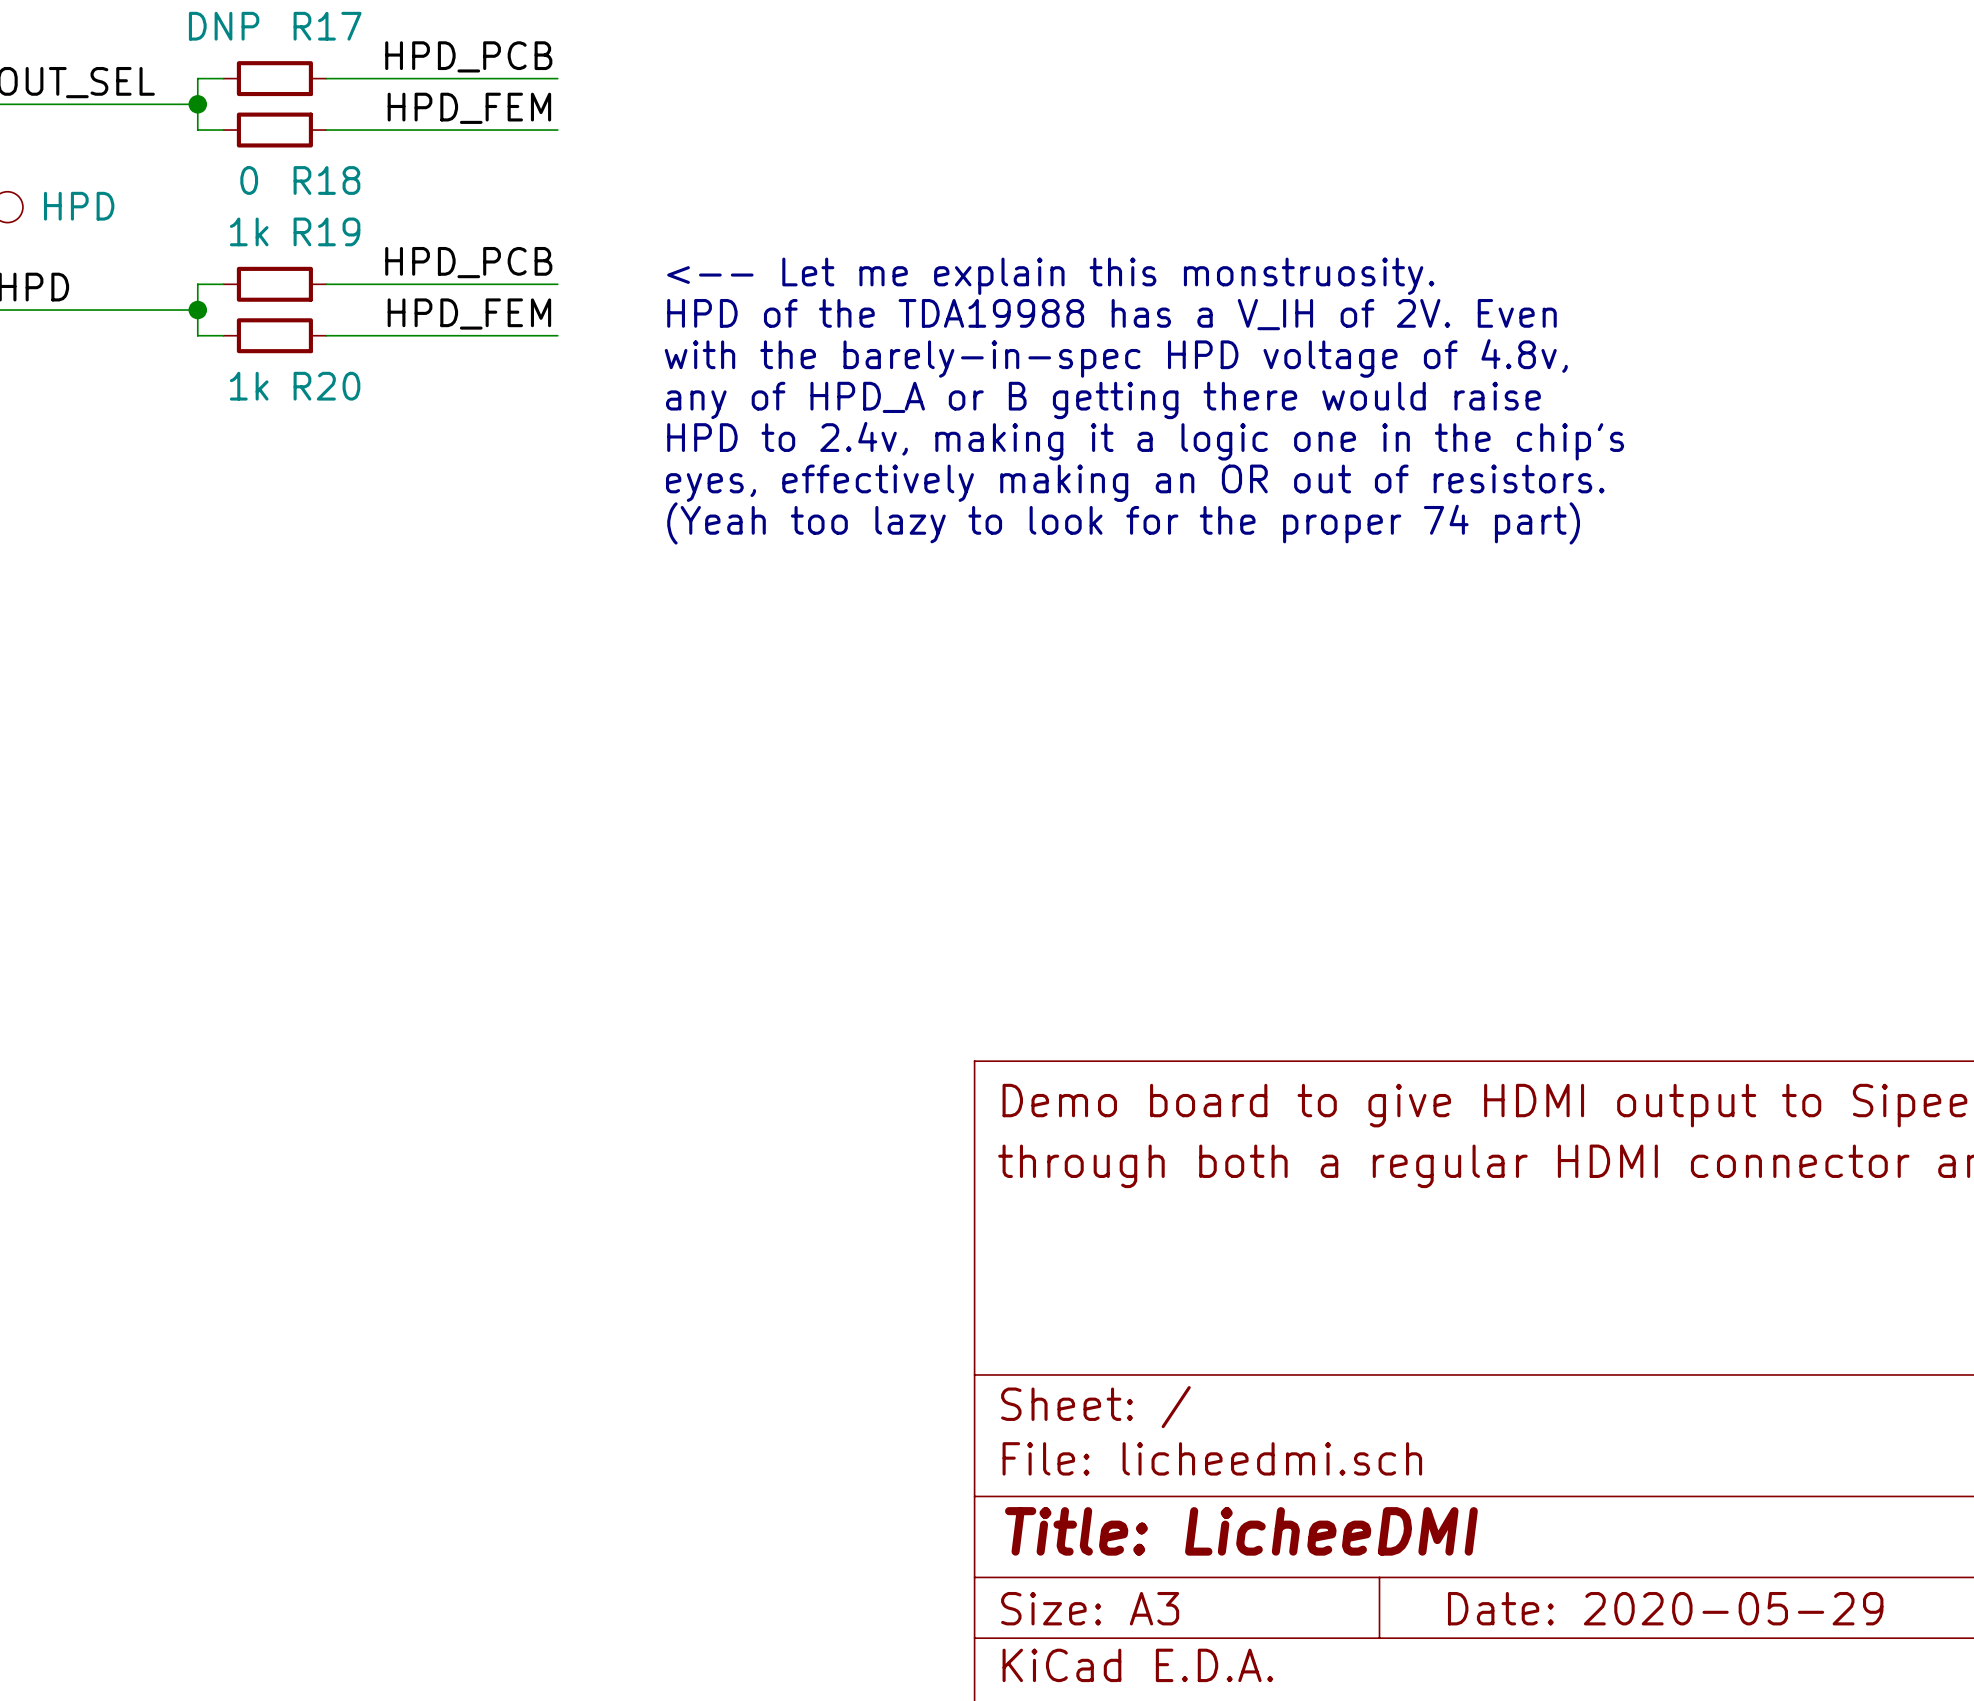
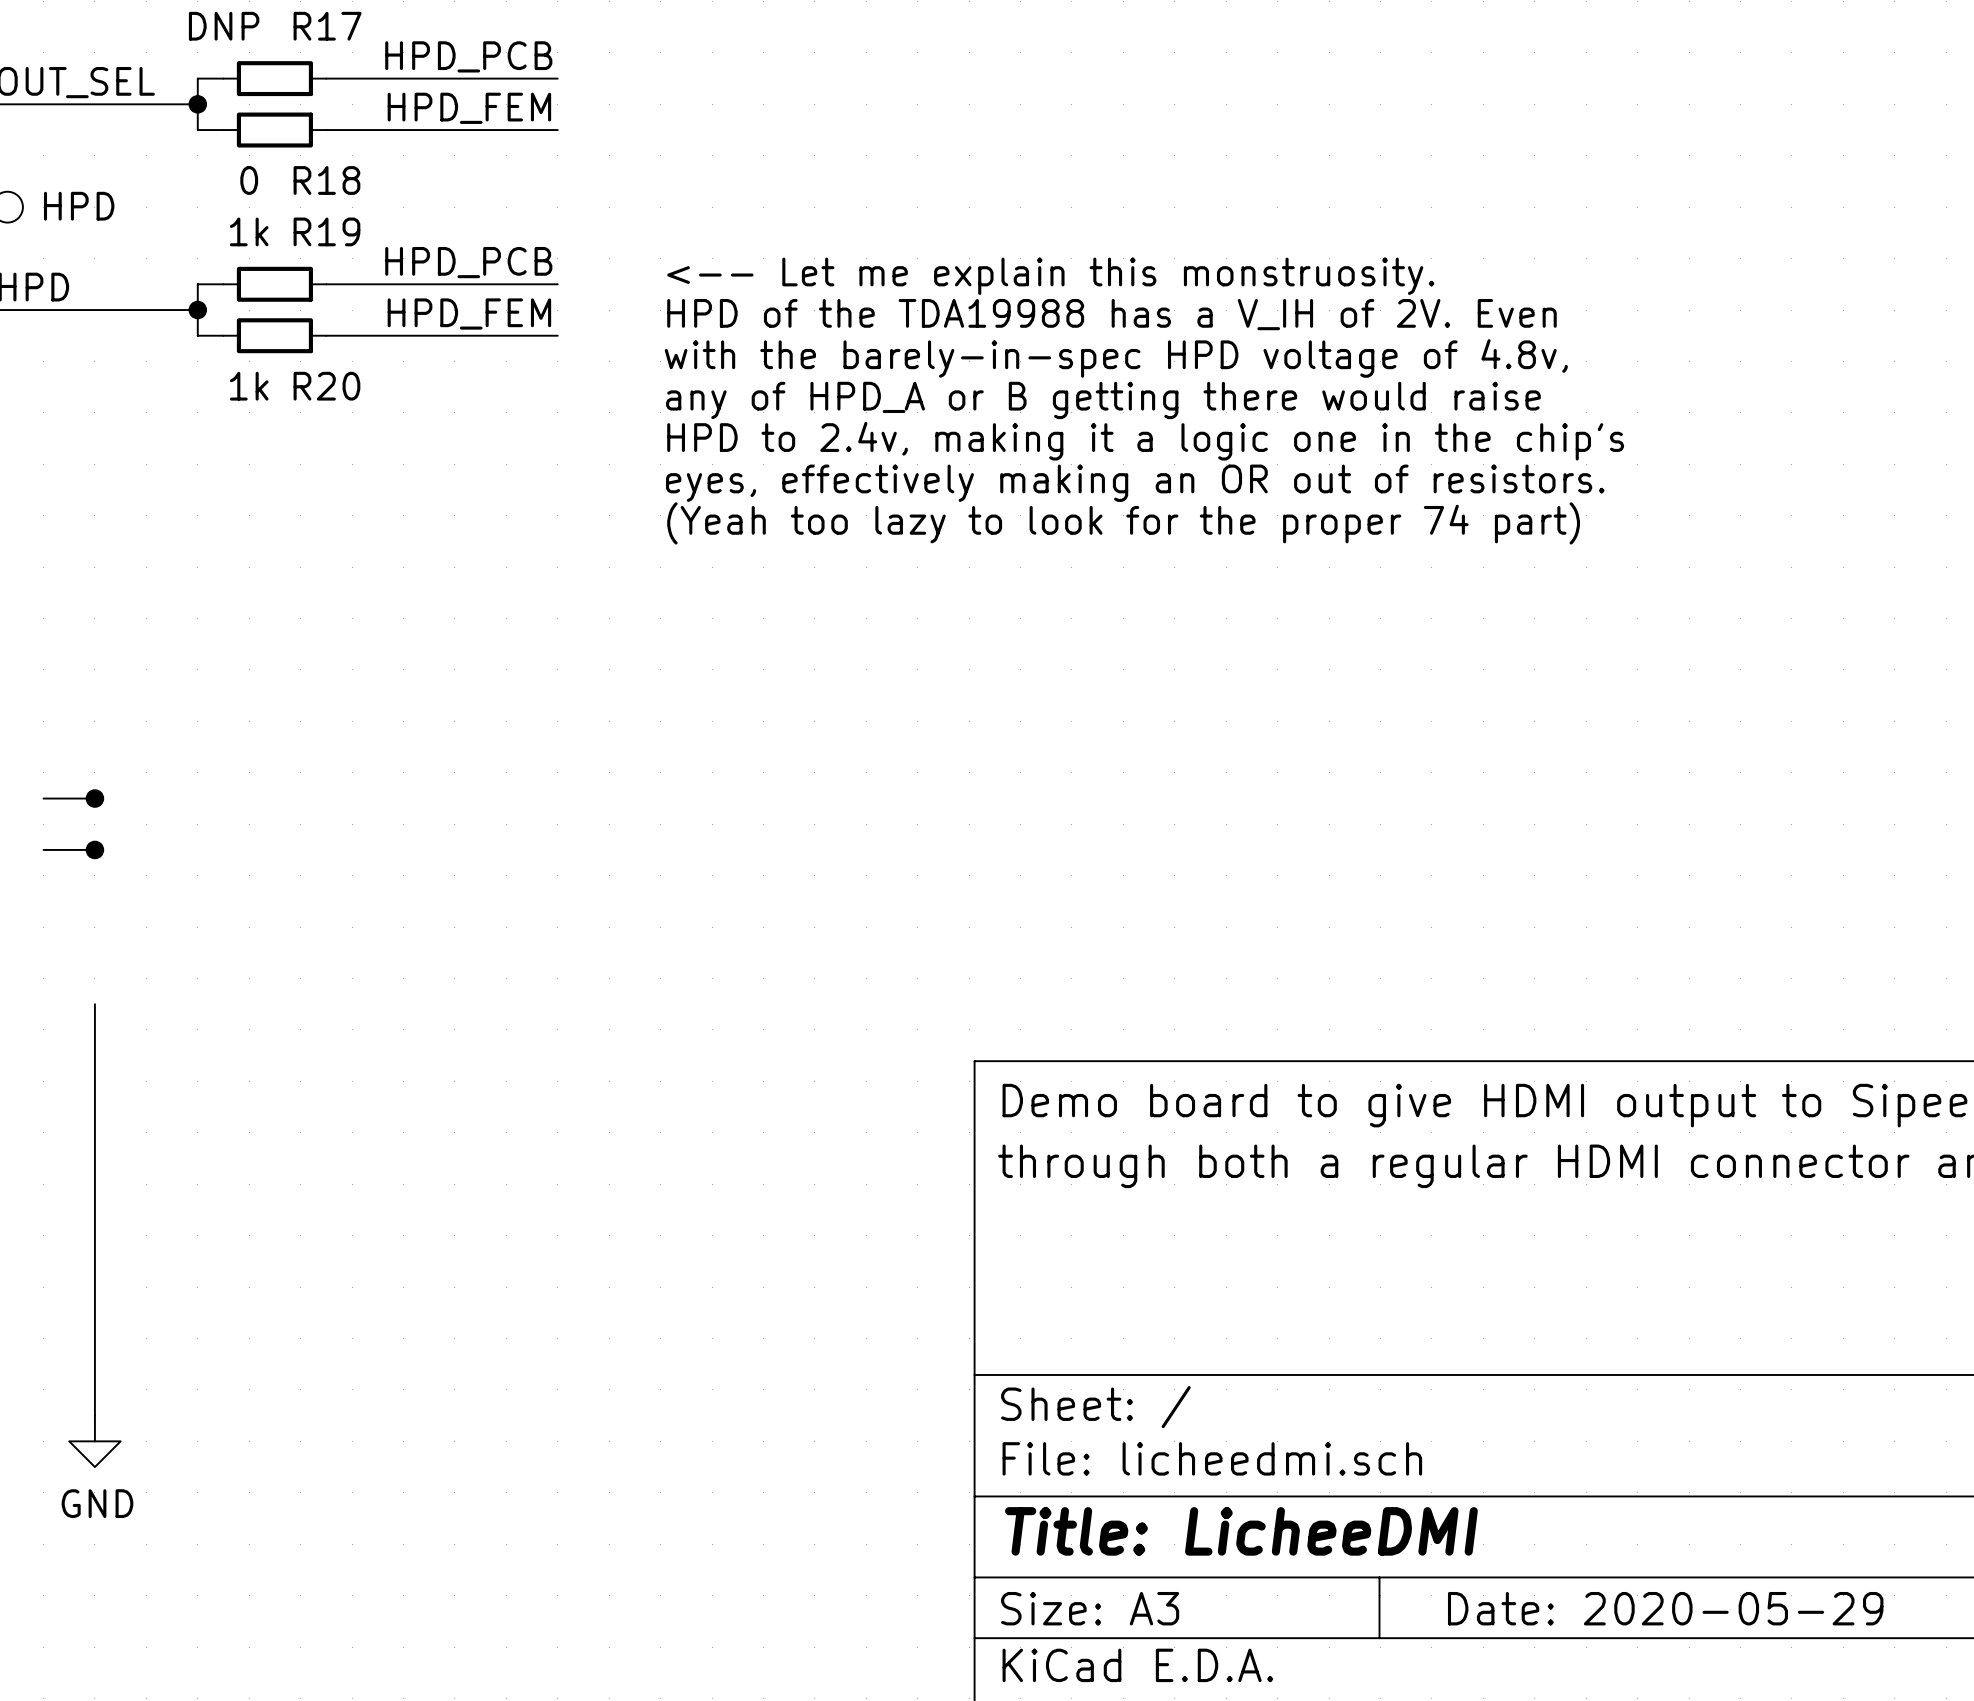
wire: none -> (43, 798) (94, 798)
junction: none -> (94, 798)
wire: none -> (43, 849) (94, 849)
junction: none -> (94, 849)
wire: none -> (94, 1004) (94, 1415)
power symbol: none -> GND (94, 1441)

